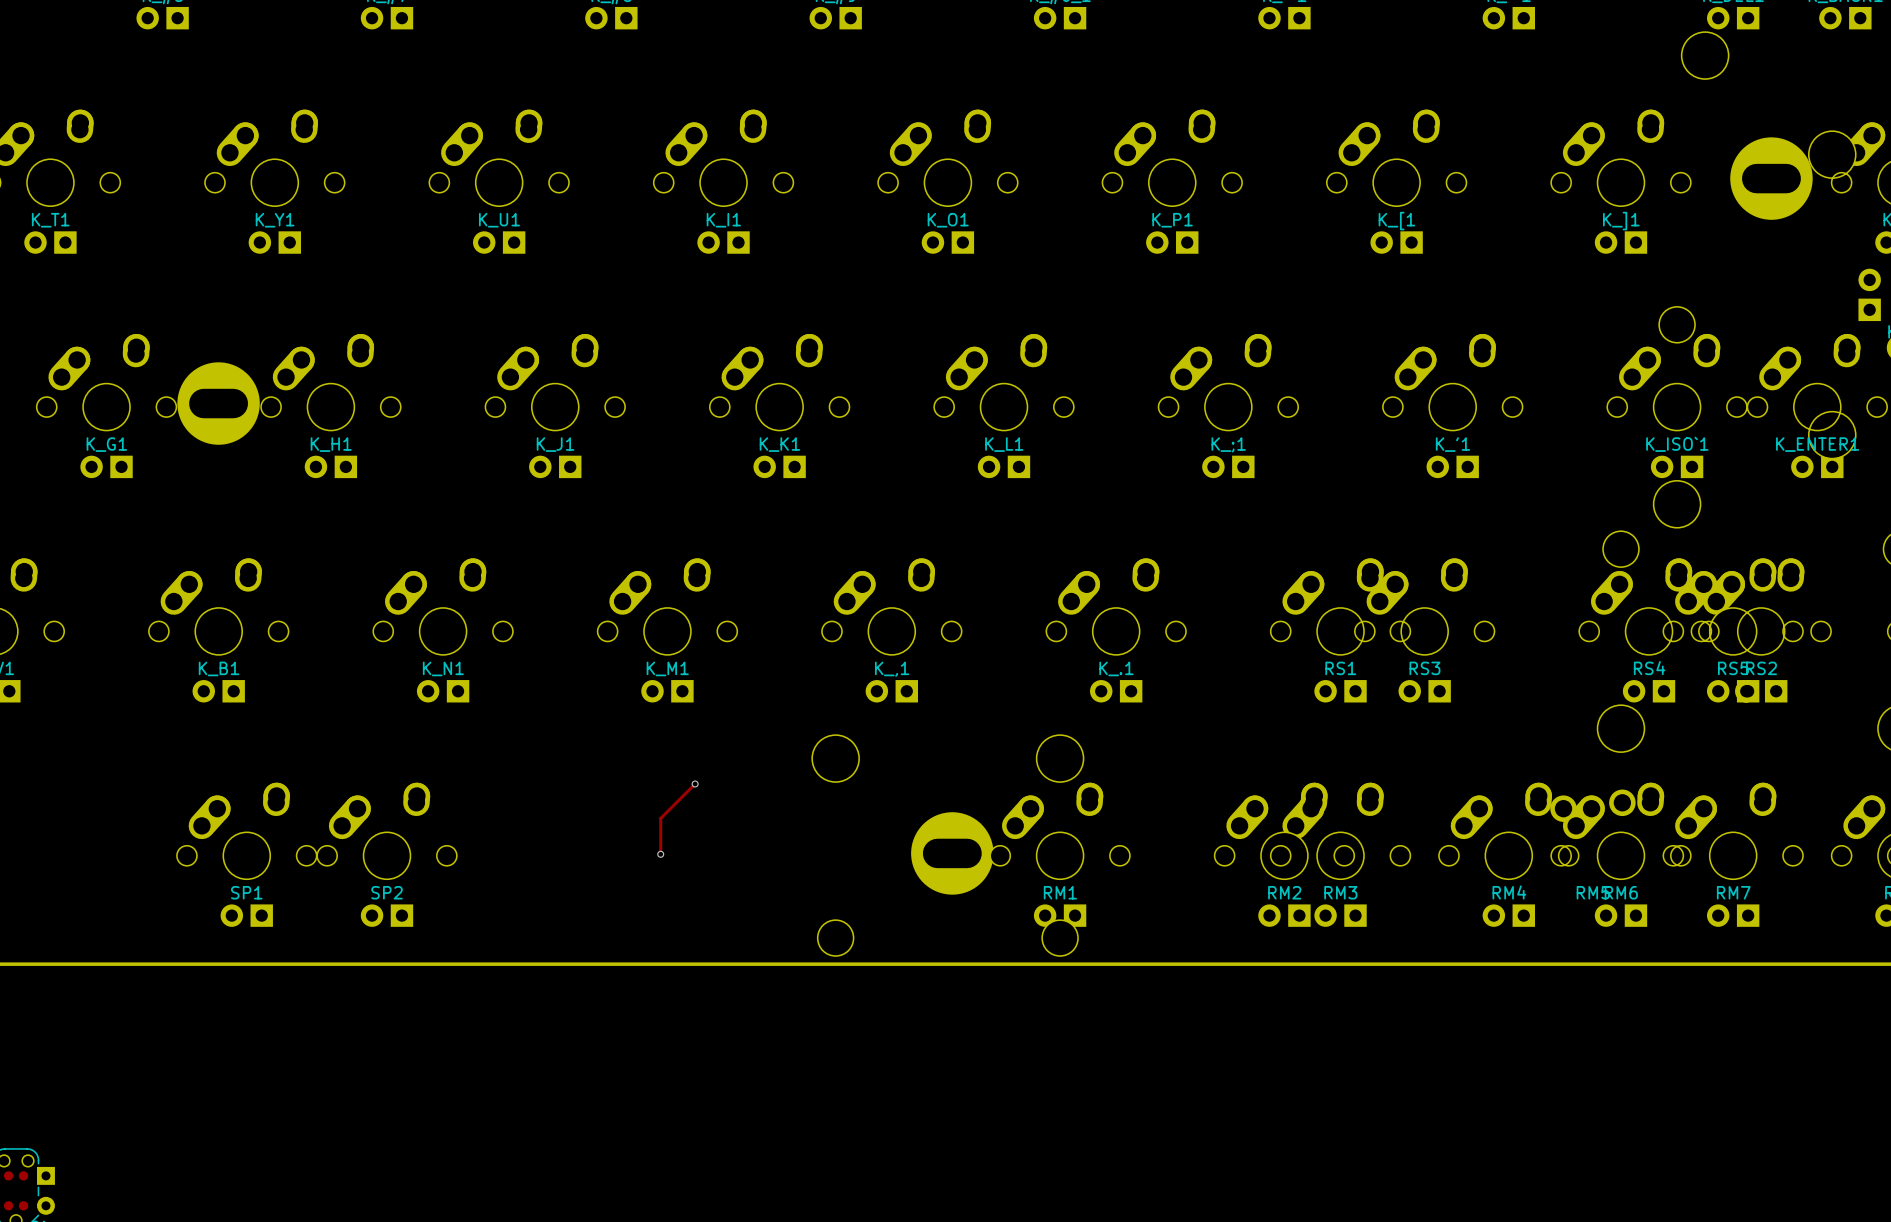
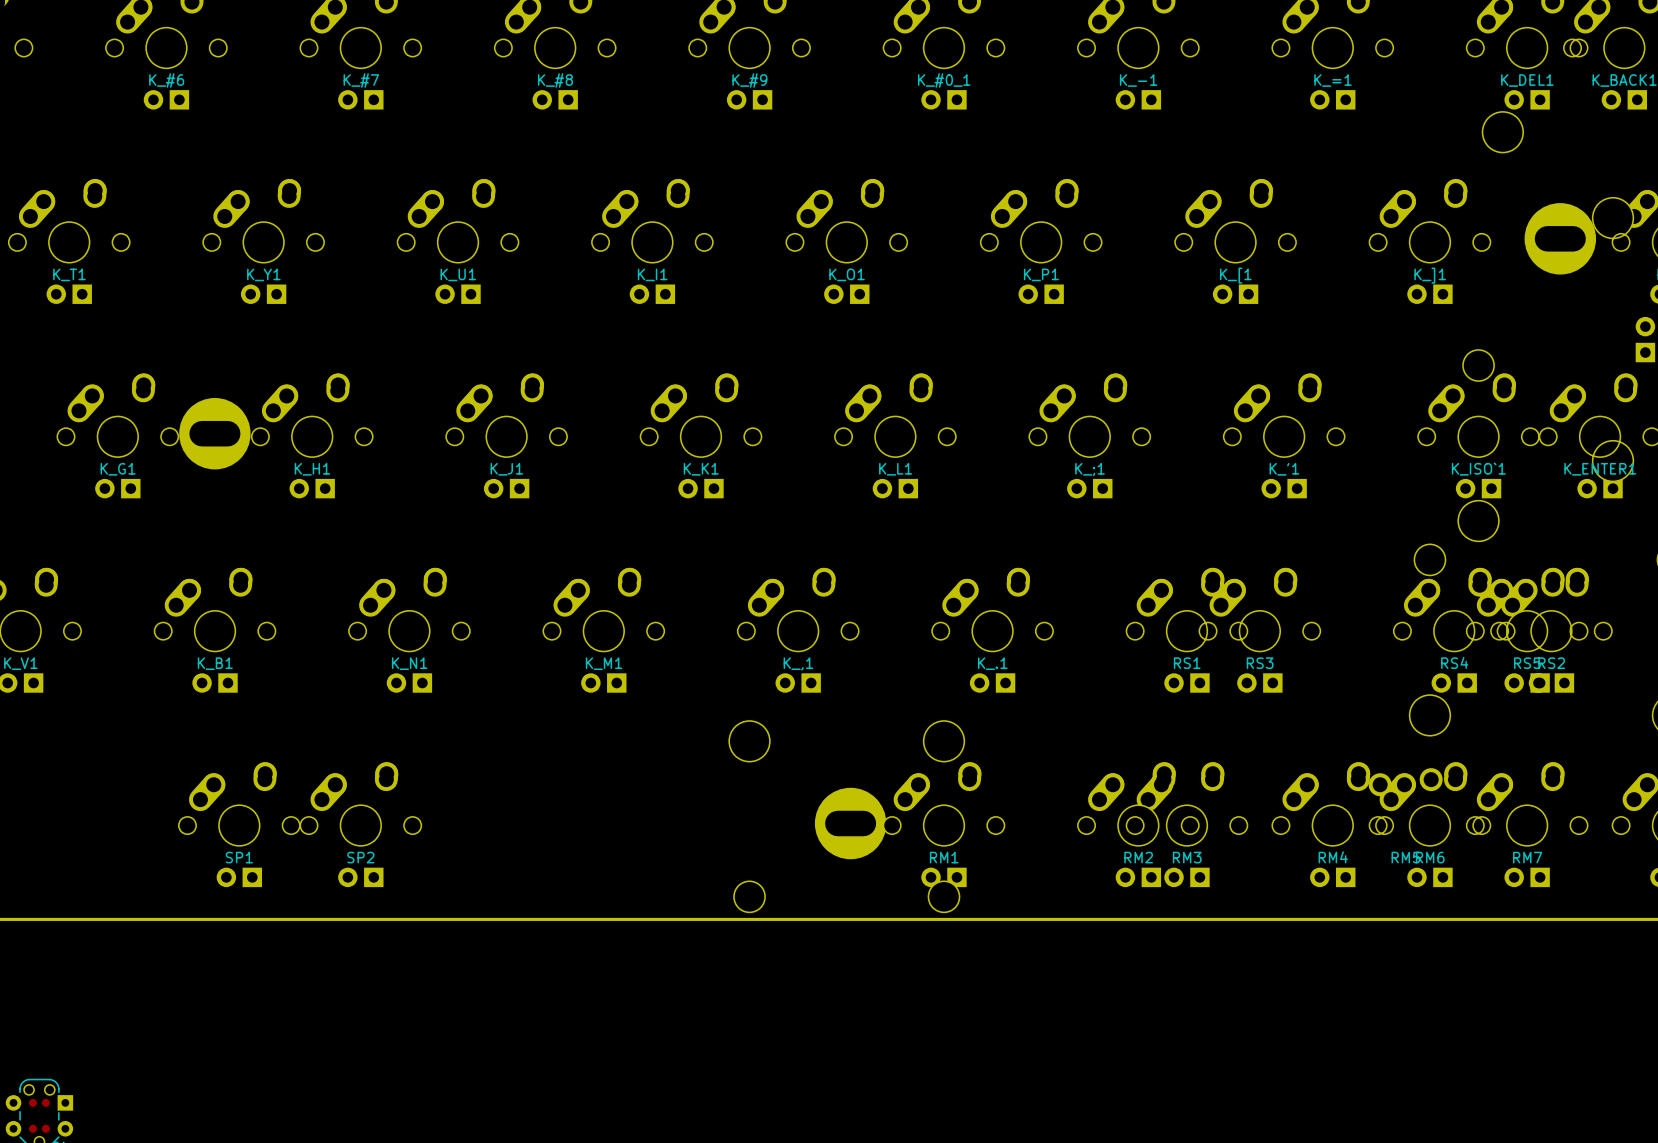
track: (695, 784) (660, 818) (660, 854) -> none
via: (695, 784) -> none
via: (660, 854) -> none

